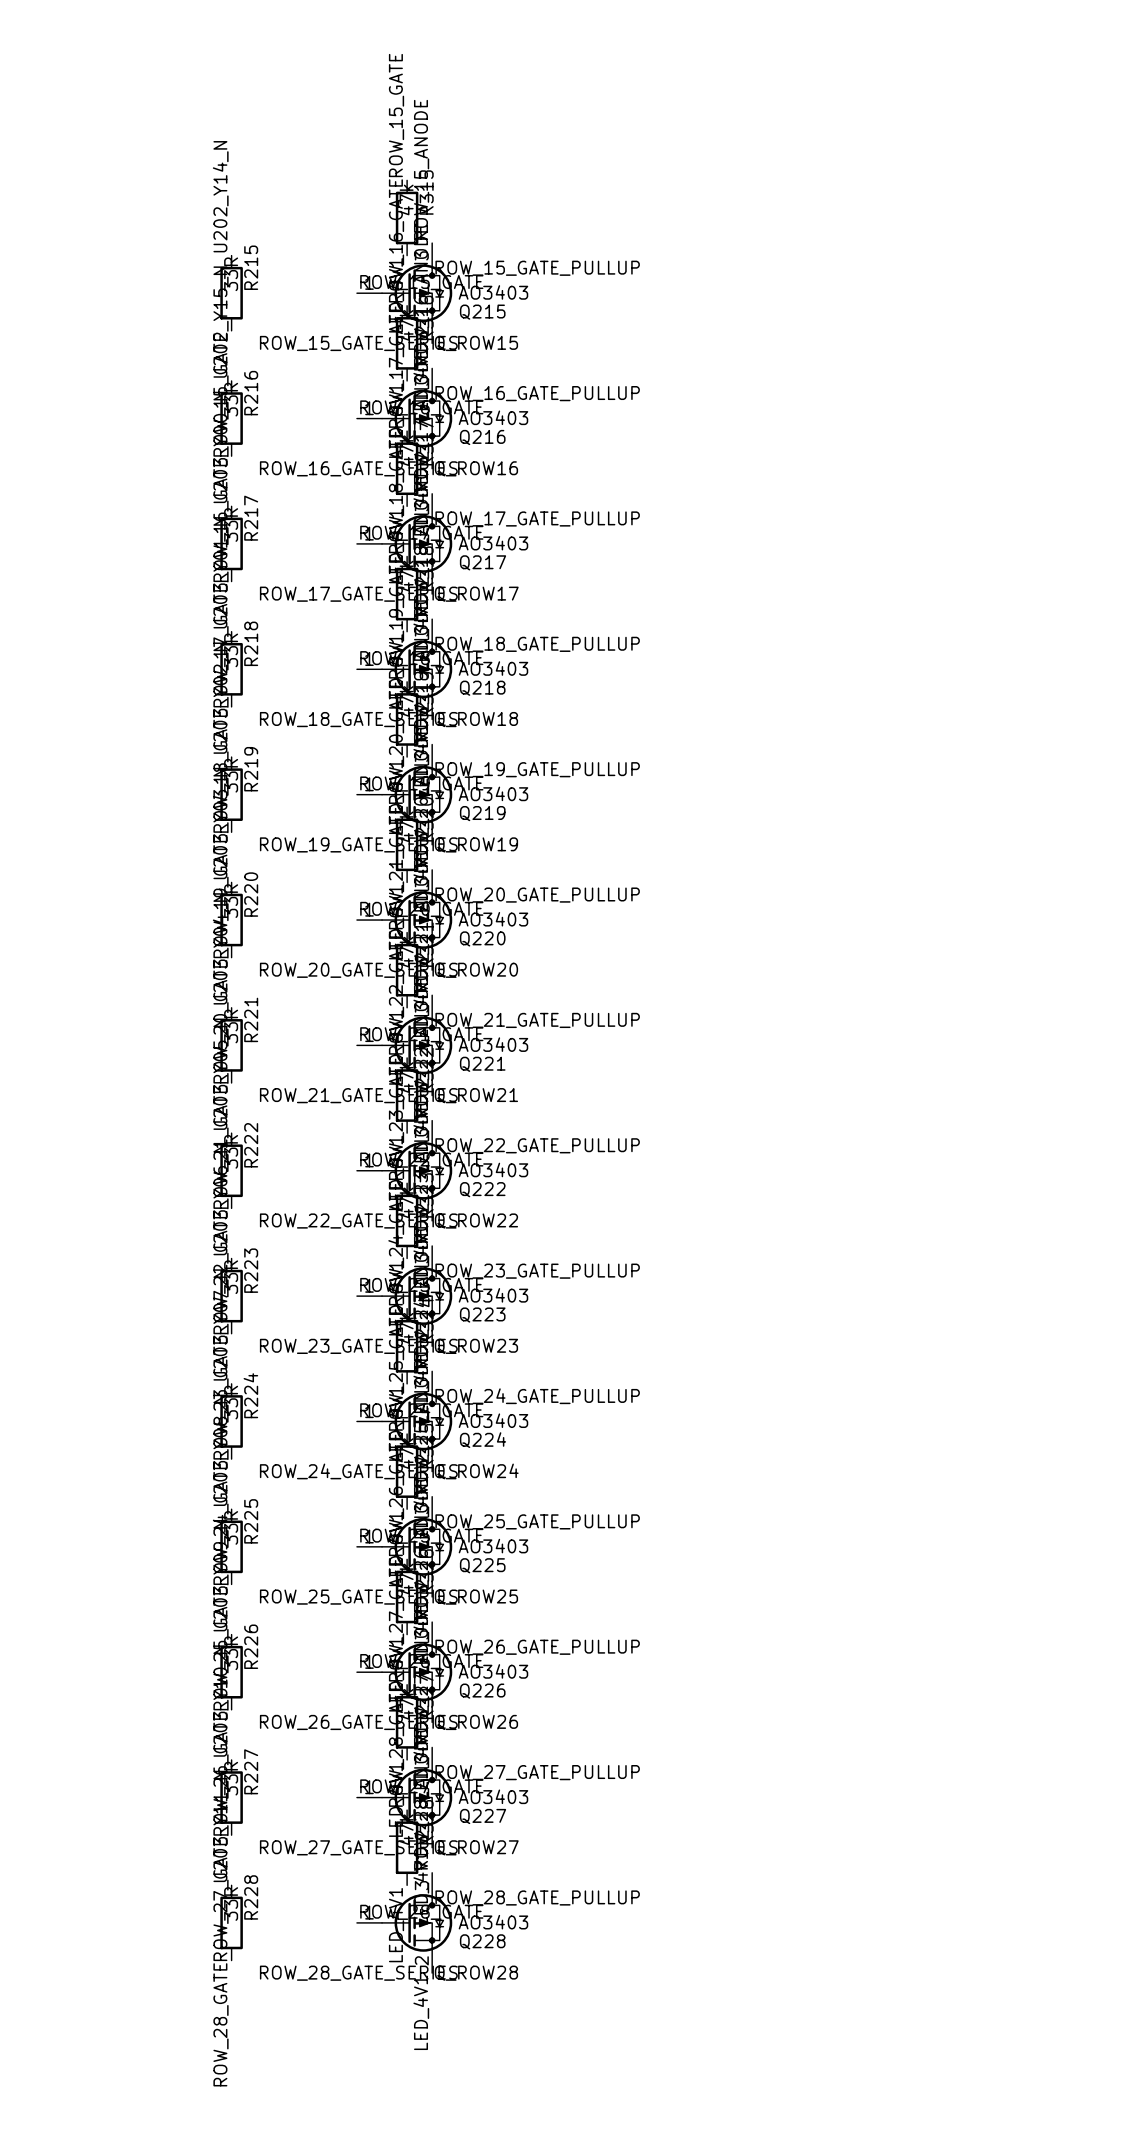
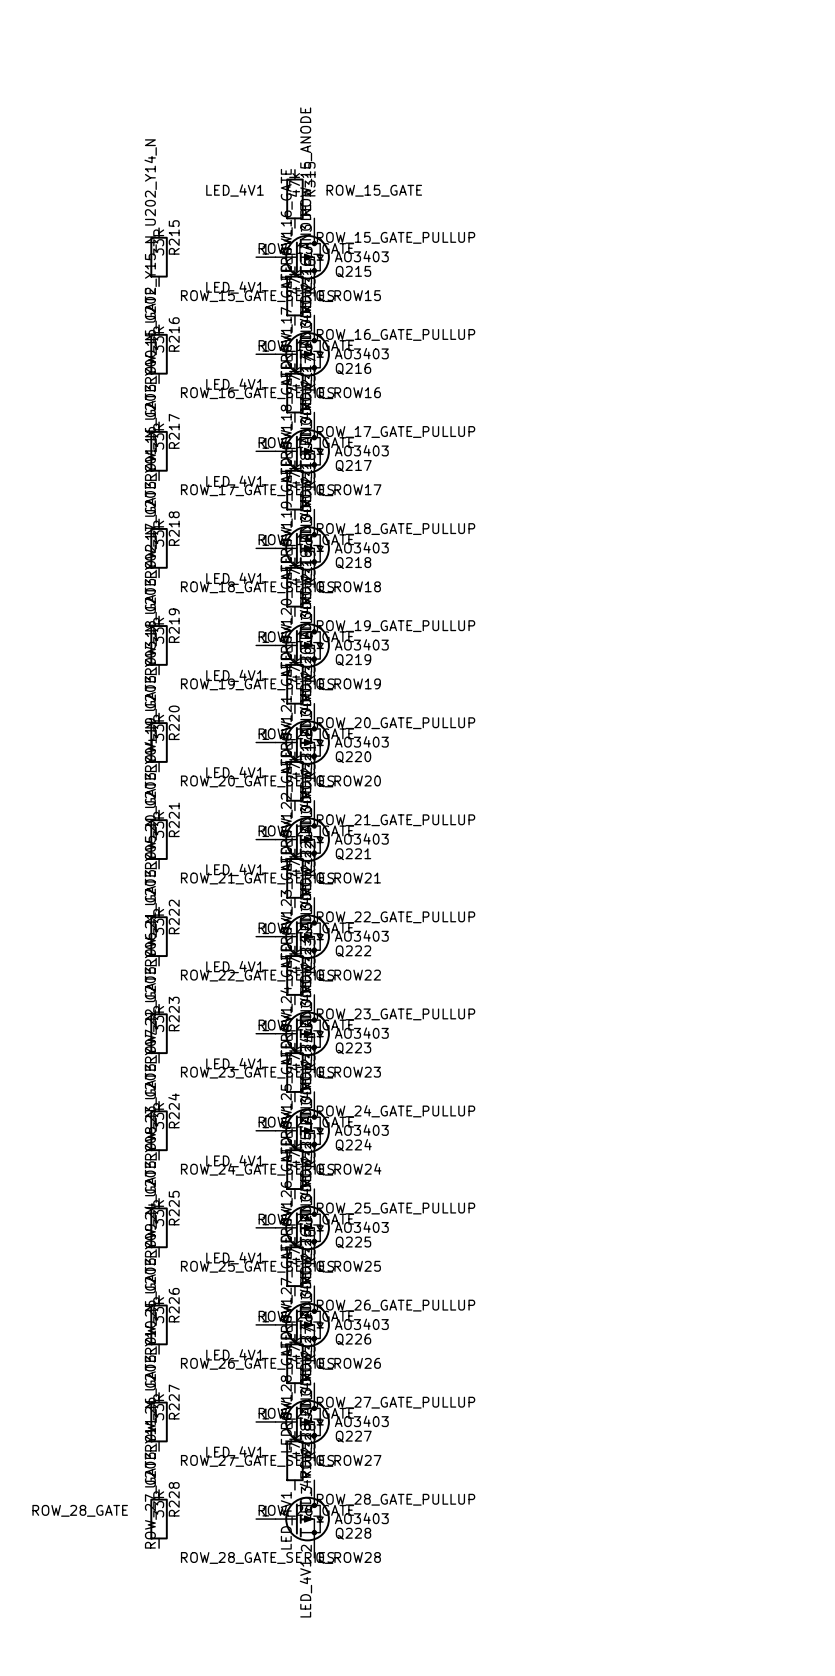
label rotation: 0° (396, 115) -> 90° clockwise (374, 190)
label position: ROW_15_GATE (396, 115) -> ROW_15_GATE (374, 190)
label: none -> LED_4V1 (235, 190)
label: none -> LED_4V1 (235, 287)
label: none -> LED_4V1 (235, 384)
label: none -> LED_4V1 (235, 481)
label: none -> LED_4V1 (235, 578)
label: none -> LED_4V1 (235, 675)
label: none -> LED_4V1 (235, 772)
label: none -> LED_4V1 (235, 869)
label: none -> LED_4V1 (235, 967)
label: none -> LED_4V1 (235, 1064)
label: none -> LED_4V1 (235, 1161)
label: none -> LED_4V1 (235, 1258)
label: none -> LED_4V1 (235, 1355)
label: none -> LED_4V1 (235, 1452)
label rotation: 0° (221, 2024) -> 90° clockwise (80, 1510)
label position: ROW_28_GATE (221, 2024) -> ROW_28_GATE (80, 1510)

